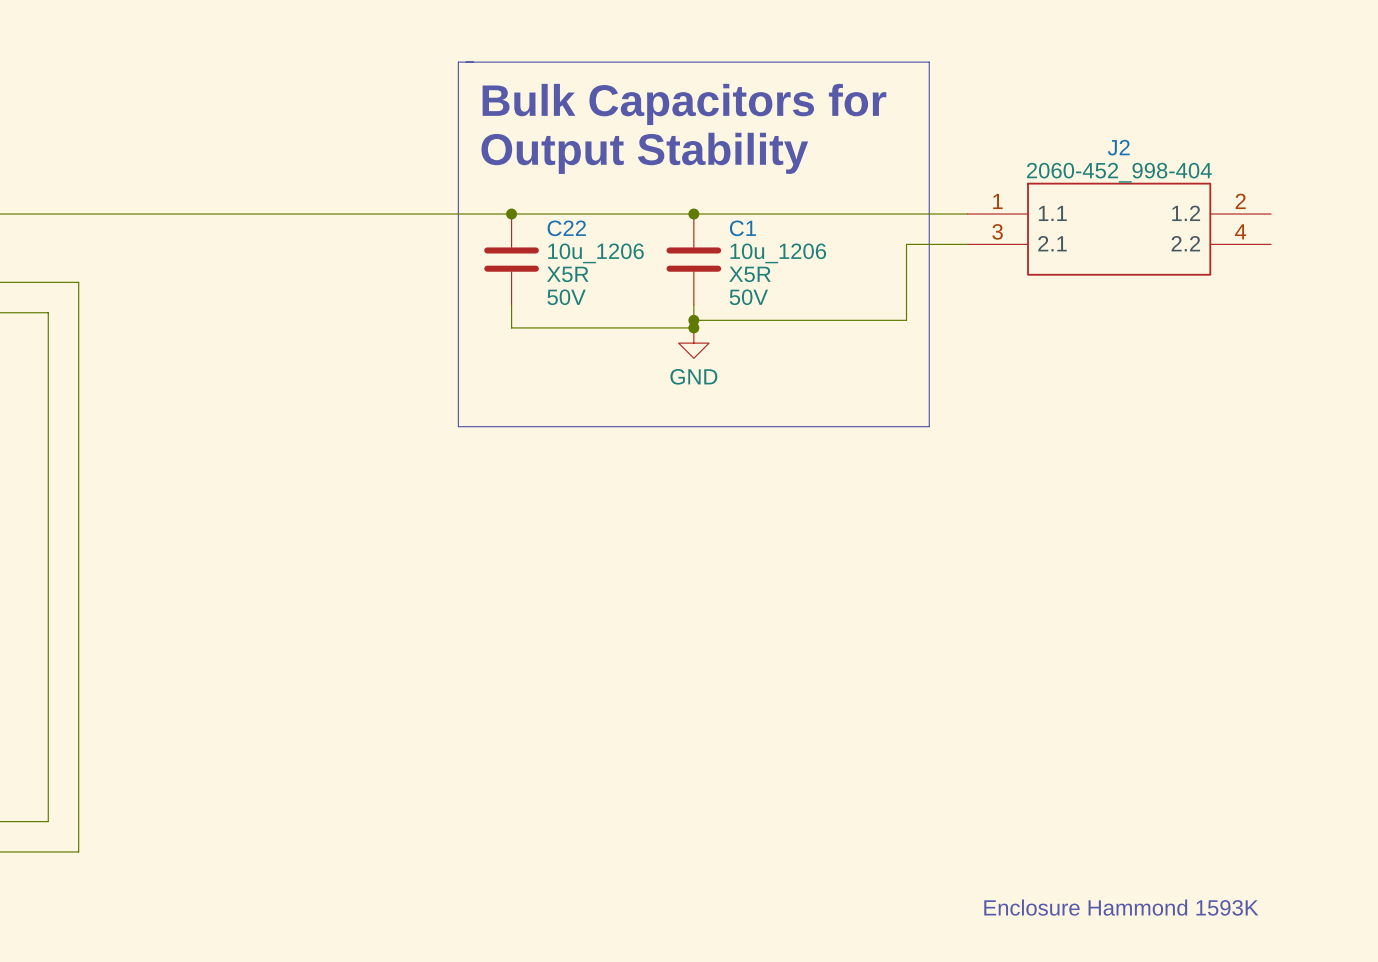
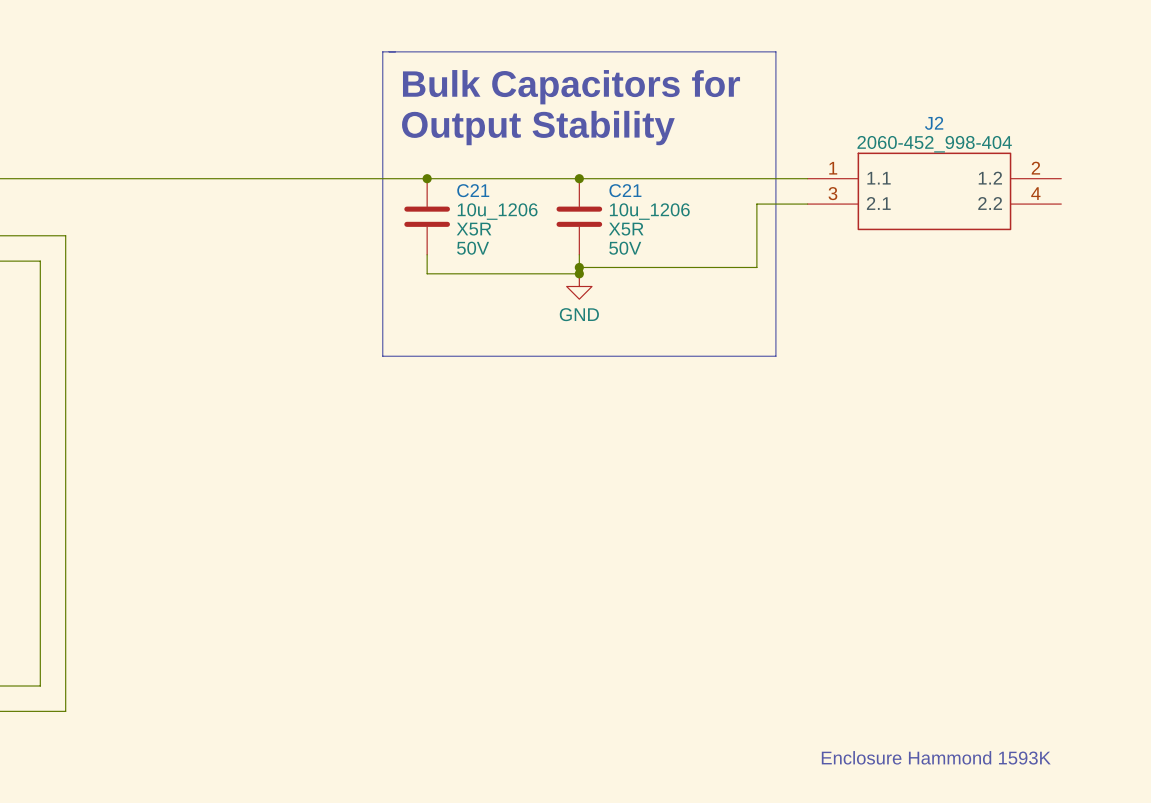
C22 name: C22 (566, 228) -> C21 (473, 190)
C1 name: C1 (742, 228) -> C21 (625, 190)

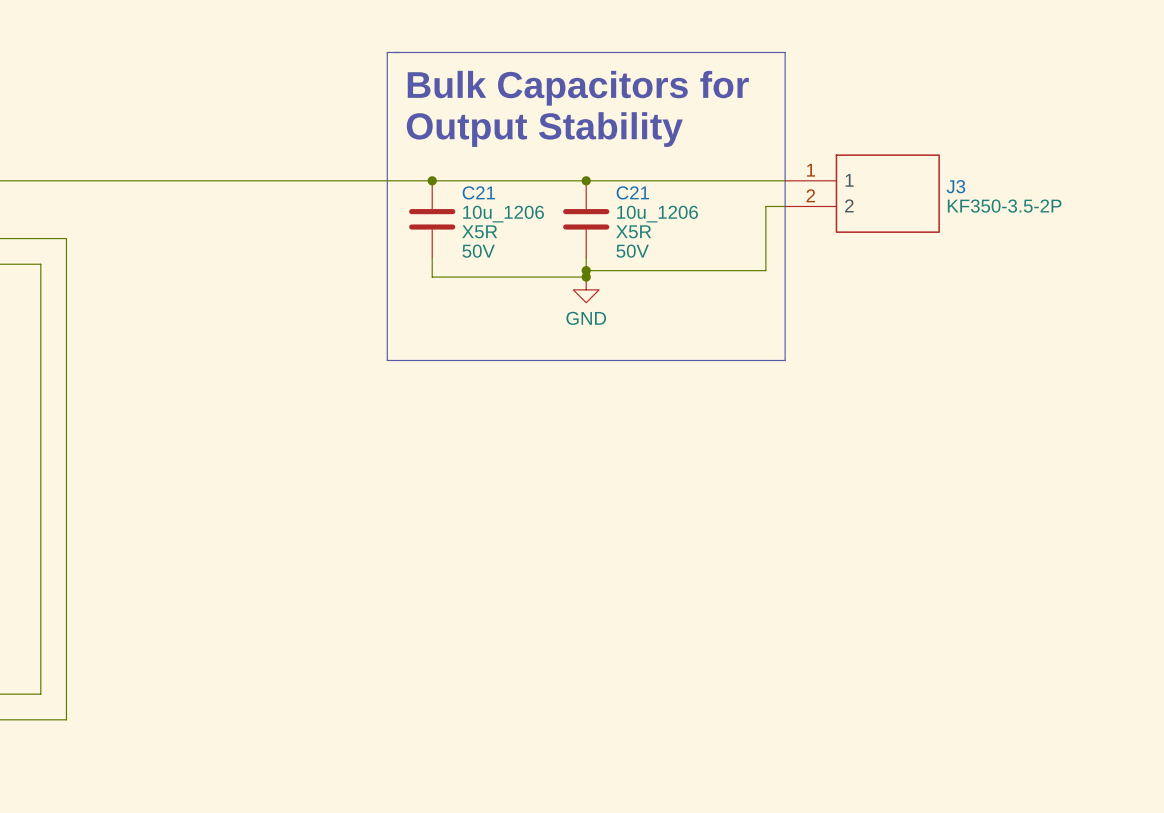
J3: none -> KF350-3.5-2P (862, 193)
J2: 2060-452_998-404 (934, 191) -> none
text: Enclosure Hammond 1593K (936, 757) -> none

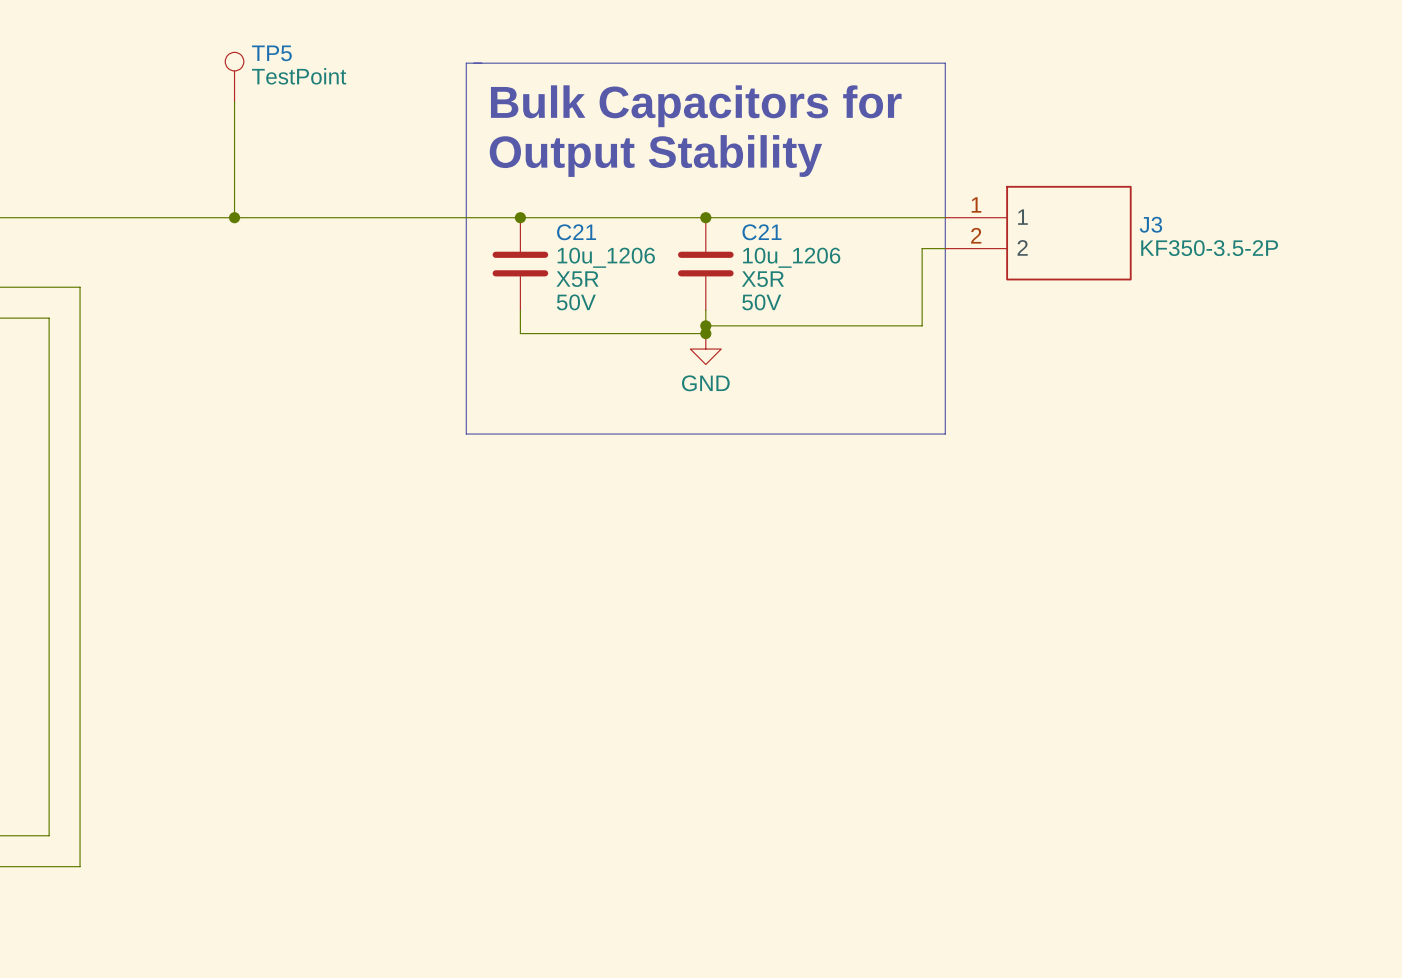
TP5: none -> TestPoint (234, 77)
wire: none -> (234, 101) (234, 217)
junction: none -> (234, 217)

